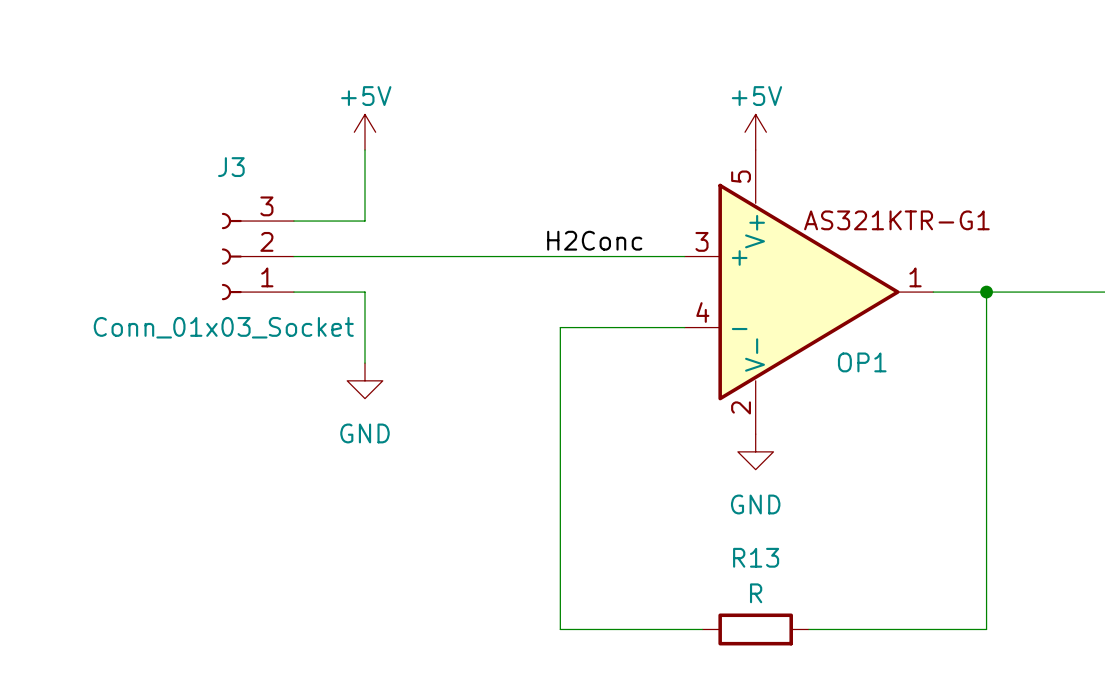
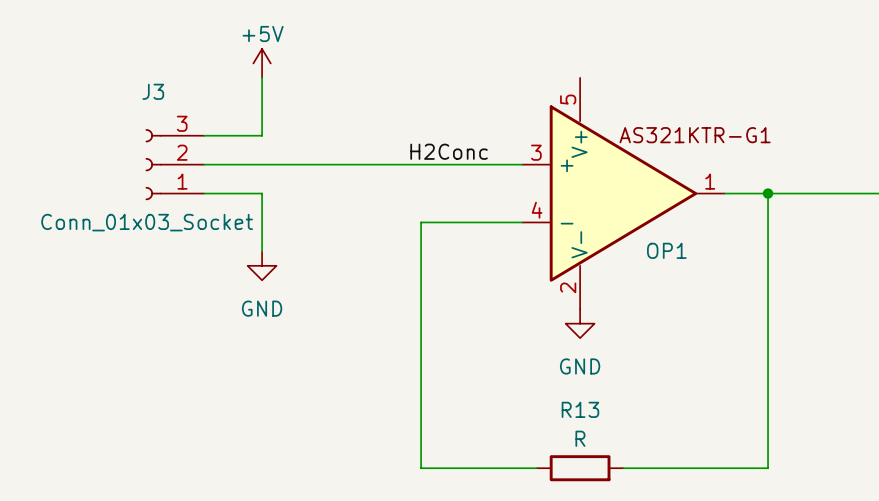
power symbol: +5V (755, 132) -> none

